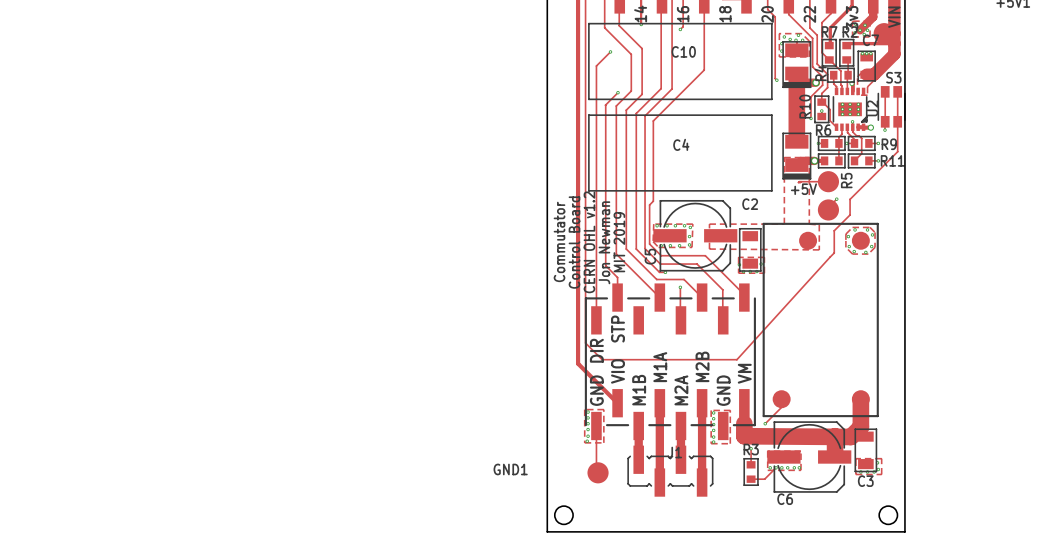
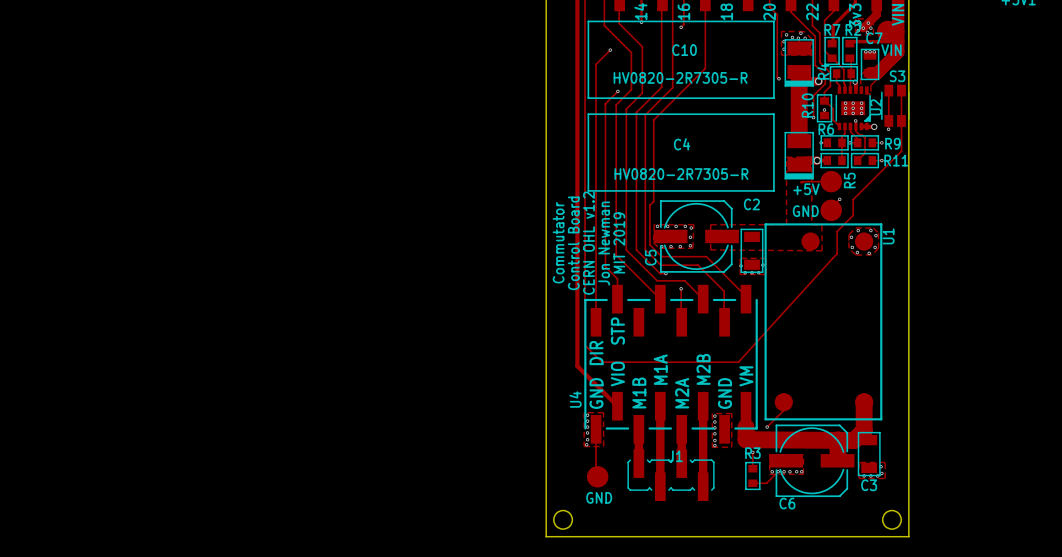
text: none -> VIN (891, 50)
text: none -> HV0820-2R7305-R (680, 77)
text: none -> HV0820-2R7305-R (681, 174)
text: none -> GND (805, 211)
U1 name: none -> U1 (888, 236)
U4 name: none -> U4 (575, 399)
GND1 name: GND1 (510, 469) -> none
text: none -> GND (599, 497)

